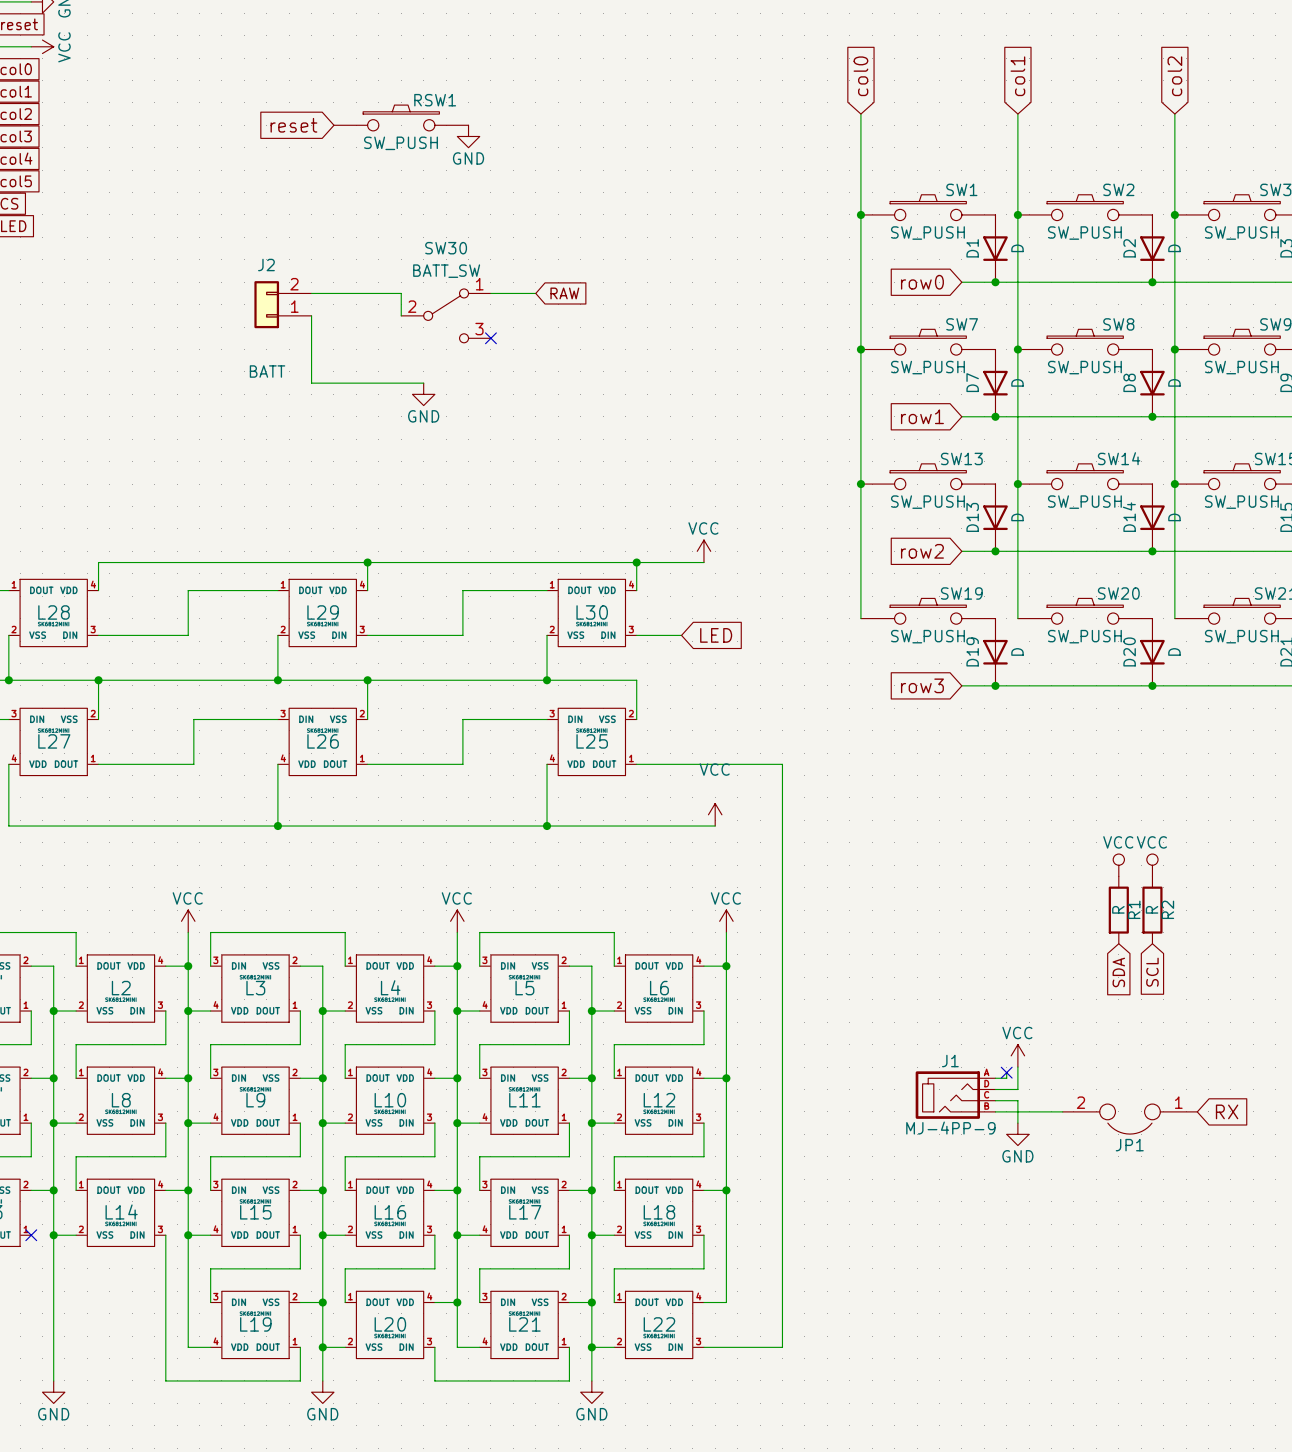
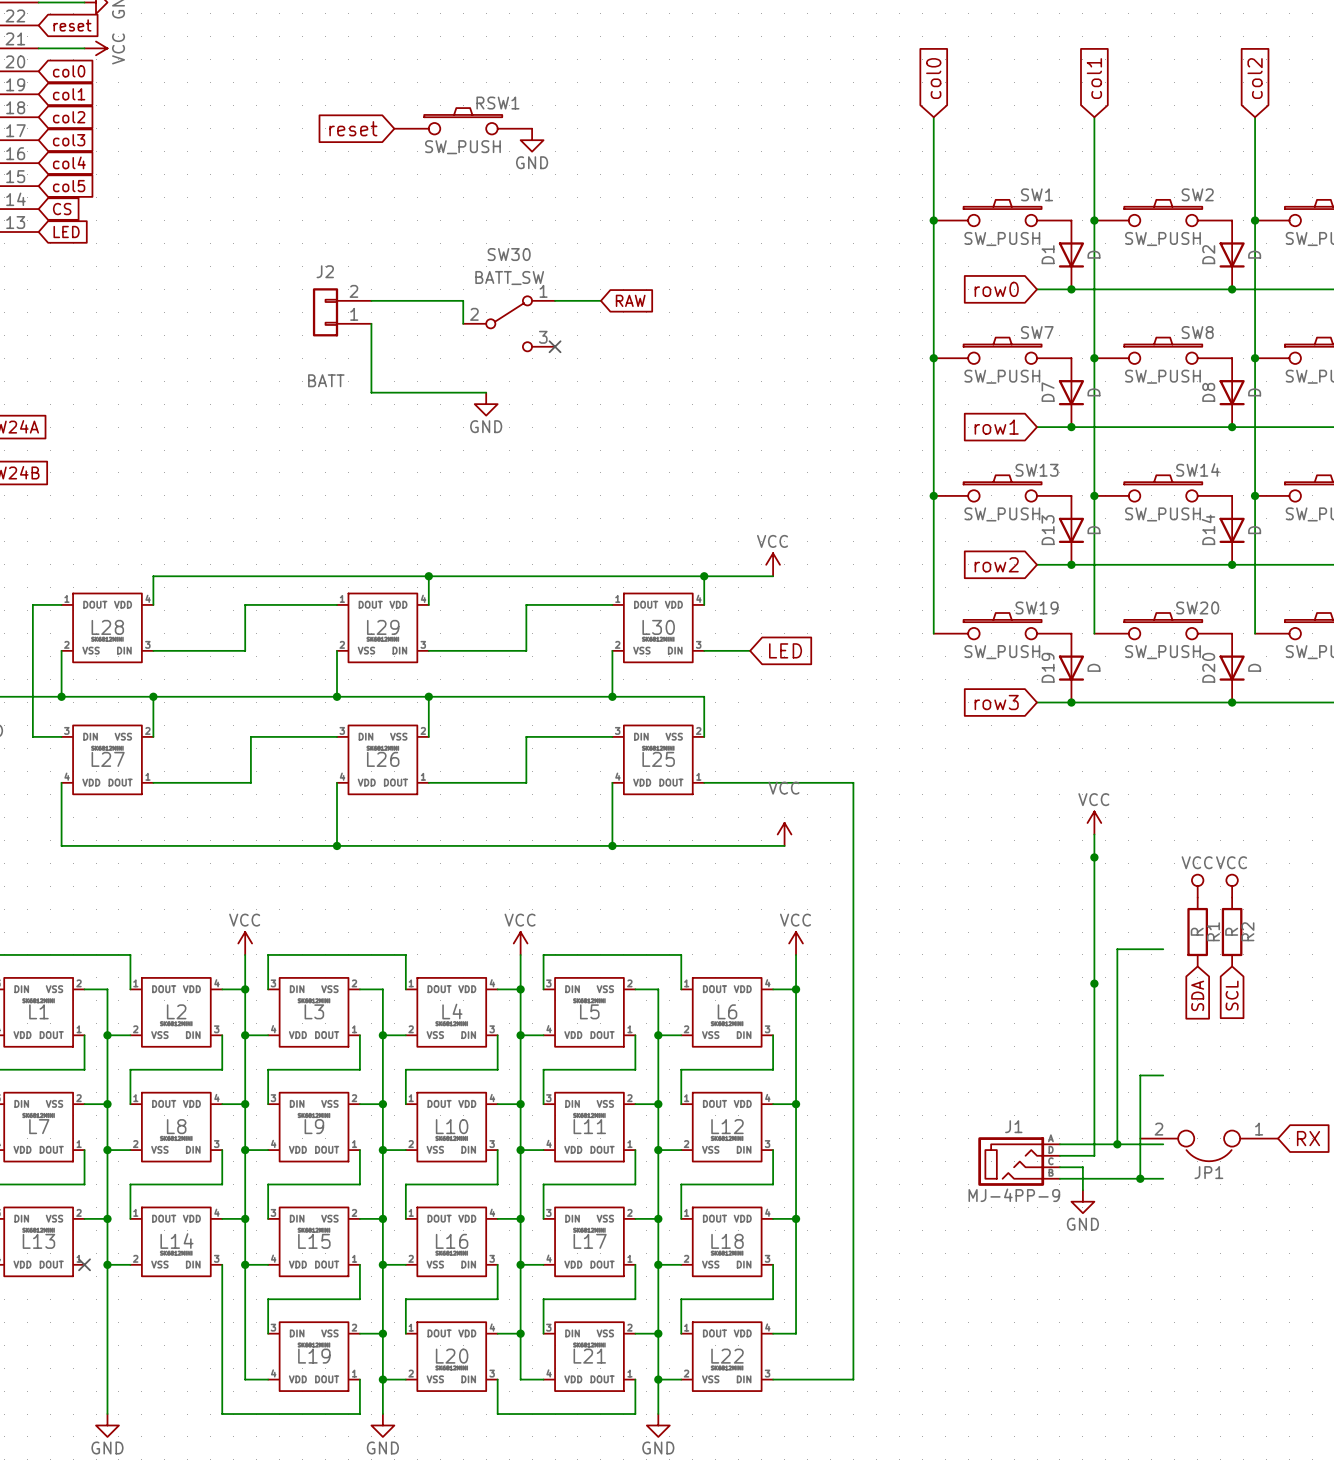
power symbol: none -> VCC (1094, 823)
wire: none -> (1094, 834) (1094, 1092)
junction: none -> (1094, 857)
wire: none -> (1163, 949) (1117, 949) (1117, 1144)
junction: none -> (1094, 983)
wire: none -> (1163, 1075) (1140, 1075) (1140, 1178)
power symbol: VCC (1017, 1055) -> none
wire: (1006, 1072) (1006, 1078) (995, 1078) -> none
no-connect mark: (1006, 1072) -> none
wire: (995, 1089) (1017, 1089) -> (1094, 1127) (1094, 1115)
J1 position: (955, 1095) -> (1019, 1161)
wire: (995, 1100) (1017, 1100) -> none
wire: (995, 1111) (1062, 1111) -> none
wire: none -> (1059, 1144) (1163, 1144)
junction: none -> (1117, 1144)
wire: none -> (1094, 1150) (1094, 1155) (1059, 1155)
power symbol position: GND (1017, 1134) -> GND (1082, 1201)
wire: none -> (1059, 1167) (1082, 1167) (1082, 1190)
wire: none -> (1059, 1178) (1163, 1178)
junction: none -> (1140, 1178)

